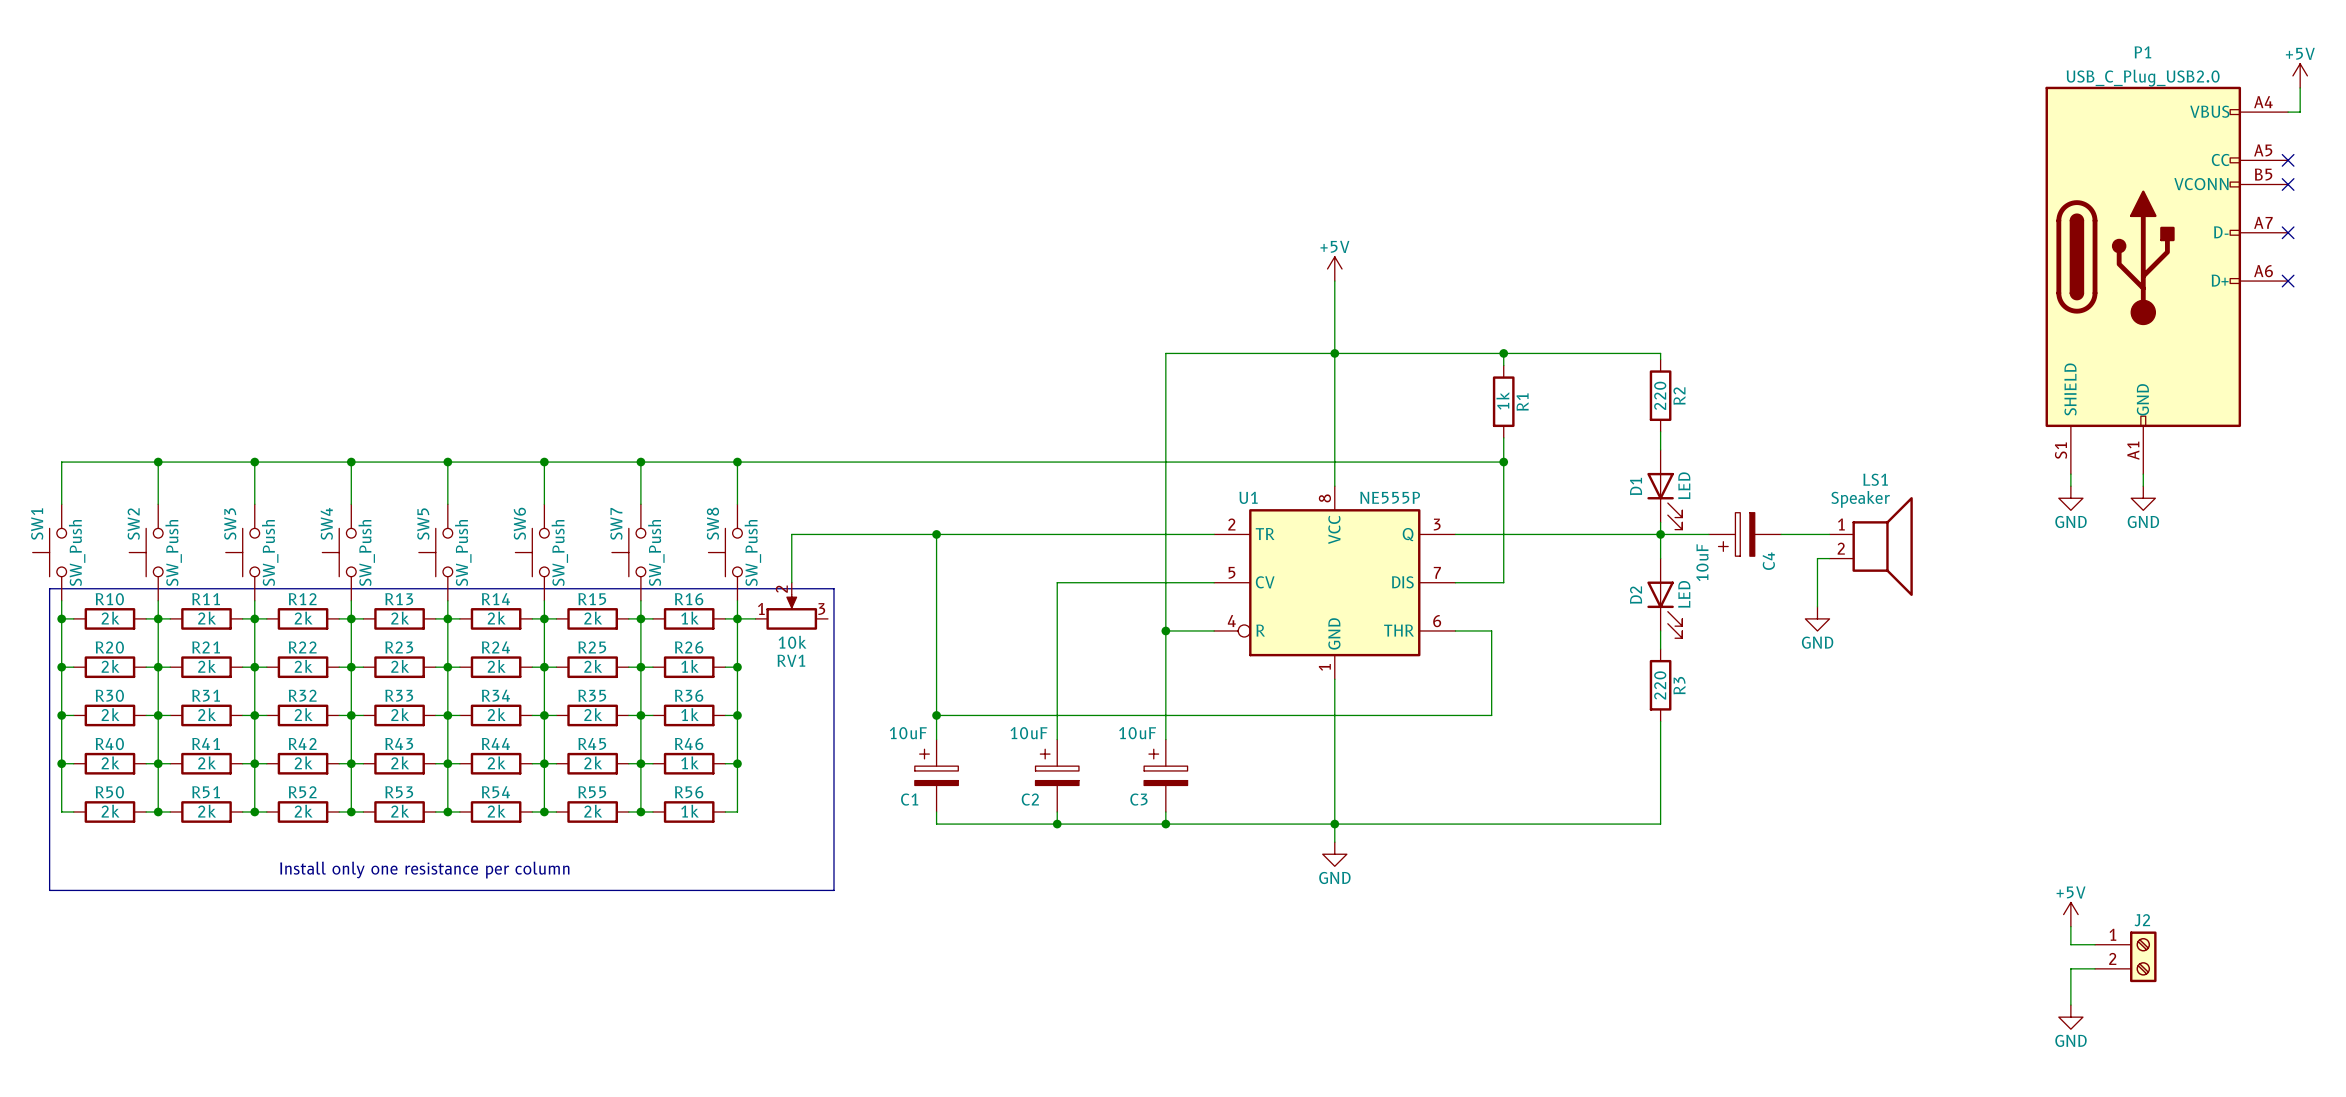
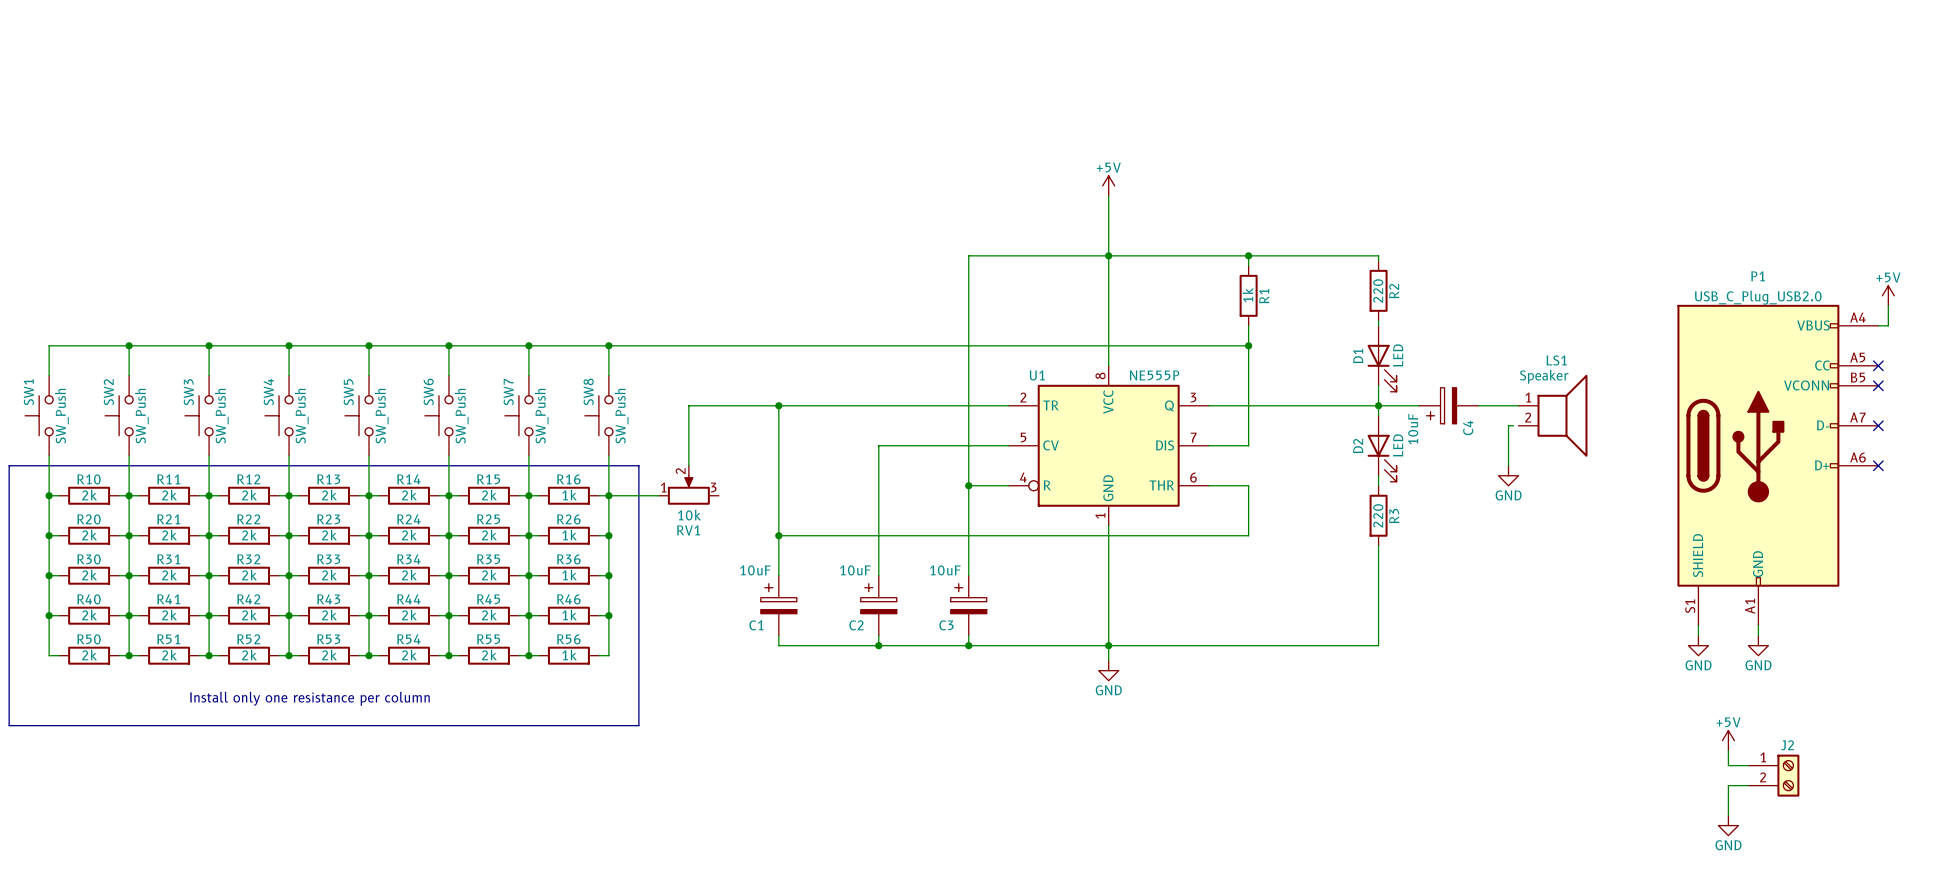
power symbol: +5V (2300, 75) -> none
wire: (2300, 87) (2300, 112) (2288, 112) -> none
no-connect mark: (2288, 160) -> none
no-connect mark: (2288, 184) -> none
no-connect mark: (2288, 232) -> none
power symbol position: +5V (1334, 268) -> +5V (1108, 185)
P1 position: (2166, 280) -> (1777, 465)
wire: (1334, 281) (1334, 486) -> (1108, 195) (1108, 365)
no-connect mark: (2288, 281) -> none
junction position: (1334, 353) -> (1108, 255)
wire: (1503, 353) (1503, 365) -> (1248, 255) (1248, 265)
junction position: (1503, 353) -> (1248, 255)
wire: (1660, 359) (1660, 353) (1165, 353) (1165, 739) -> (1378, 260) (1378, 255) (968, 255) (968, 575)
power symbol: none -> +5V (1888, 295)
wire: none -> (1888, 305) (1888, 325) (1878, 325)
R2 position: (1660, 395) -> (1378, 290)
R1 position: (1503, 401) -> (1248, 295)
wire: none -> (1378, 320) (1378, 325)
wire: (1660, 431) (1660, 449) -> none
wire: none -> (129, 345) (129, 365)
wire: none -> (209, 345) (209, 365)
wire: none -> (289, 345) (289, 365)
wire: none -> (369, 345) (369, 365)
wire: none -> (448, 345) (448, 365)
wire: none -> (528, 345) (528, 365)
wire: none -> (608, 345) (608, 365)
wire: (1503, 437) (1503, 582) (1455, 582) -> (1248, 325) (1248, 445) (1208, 445)
wire: (61, 462) (1503, 462) -> (49, 365) (49, 345) (1248, 345)
junction position: (158, 462) -> (129, 345)
junction position: (254, 462) -> (209, 345)
junction position: (351, 462) -> (289, 345)
junction position: (447, 462) -> (369, 345)
junction position: (544, 462) -> (448, 345)
junction position: (640, 462) -> (528, 345)
junction position: (737, 462) -> (608, 345)
junction position: (1503, 462) -> (1248, 345)
no-connect mark: none -> (1878, 365)
no-connect mark: none -> (1878, 385)
D1 position: (1664, 489) -> (1382, 358)
power symbol: GND (2070, 498) -> none
power symbol: GND (2143, 498) -> none
wire: none -> (1008, 405) (688, 405) (688, 465)
wire: none -> (1478, 405) (1518, 405)
wire: (1660, 522) (1660, 558) -> (1378, 385) (1378, 415)
wire: (936, 534) (936, 739) -> (778, 405) (778, 575)
junction position: (936, 534) -> (778, 405)
wire: (1214, 534) (791, 534) (791, 582) -> none
wire: (1455, 534) (1708, 534) -> (1208, 405) (1418, 405)
junction position: (1660, 534) -> (1378, 405)
C4 position: (1745, 534) -> (1448, 405)
wire: (1781, 534) (1823, 534) -> (1508, 465) (1508, 425)
no-connect mark: none -> (1878, 425)
LS1 position: (1871, 546) -> (1552, 415)
SW1 position: (49, 552) -> (39, 415)
SW2 position: (146, 552) -> (119, 415)
SW3 position: (242, 552) -> (199, 415)
SW4 position: (339, 552) -> (279, 415)
SW5 position: (435, 552) -> (359, 415)
SW6 position: (532, 552) -> (438, 415)
SW7 position: (628, 552) -> (518, 415)
SW8 position: (725, 552) -> (598, 415)
wire: (1829, 558) (1817, 558) (1817, 606) -> none
wire: (1214, 582) (1057, 582) (1057, 739) -> (1008, 445) (878, 445) (878, 575)
U1 position: (1334, 582) -> (1108, 445)
no-connect mark: none -> (1878, 465)
line: (49, 588) (833, 588) (833, 890) (49, 890) (49, 588) -> (9, 465) (9, 725) (638, 725) (638, 465) (9, 465)
wire: none -> (1378, 475) (1378, 485)
D2 position: (1664, 598) -> (1382, 448)
RV1 position: (791, 606) -> (688, 485)
wire: none -> (1208, 485) (1248, 485) (1248, 535) (778, 535)
wire: none -> (623, 495) (658, 495)
power symbol position: GND (1817, 618) -> GND (1508, 475)
wire: (1165, 630) (1214, 630) -> (968, 485) (1008, 485)
junction position: (1165, 630) -> (968, 485)
wire: (1455, 630) (1491, 630) (1491, 715) (936, 715) -> none
wire: (1660, 630) (1660, 649) -> none
wire: (1334, 679) (1334, 842) -> (1108, 525) (1108, 660)
wire: none -> (1378, 545) (1378, 645) (778, 645) (778, 635)
R3 position: (1660, 685) -> (1378, 515)
junction position: (936, 715) -> (778, 535)
wire: (1660, 721) (1660, 824) (936, 824) (936, 811) -> none
C1 position: (936, 775) -> (778, 605)
C2 position: (1057, 775) -> (878, 605)
C3 position: (1165, 775) -> (968, 605)
wire: none -> (1698, 625) (1698, 635)
wire: none -> (1758, 625) (1758, 635)
power symbol: none -> GND (1698, 645)
power symbol: none -> GND (1758, 645)
wire: (1057, 811) (1057, 824) -> (878, 635) (878, 645)
wire: (1165, 811) (1165, 824) -> (968, 635) (968, 645)
junction position: (1057, 824) -> (878, 645)
junction position: (1165, 824) -> (968, 645)
junction position: (1334, 824) -> (1108, 645)
power symbol position: GND (1334, 854) -> GND (1108, 670)
text position: Install only one resistance per column (424, 870) -> Install only one resistance per column (309, 698)
power symbol position: +5V (2070, 914) -> +5V (1728, 740)
wire: (2070, 926) (2070, 944) (2088, 944) -> (1728, 750) (1728, 765)
J2 position: (2125, 956) -> (1773, 775)
wire: (2088, 968) (2070, 968) (2070, 1005) -> (1728, 785) (1728, 815)
power symbol position: GND (2070, 1017) -> GND (1728, 825)

